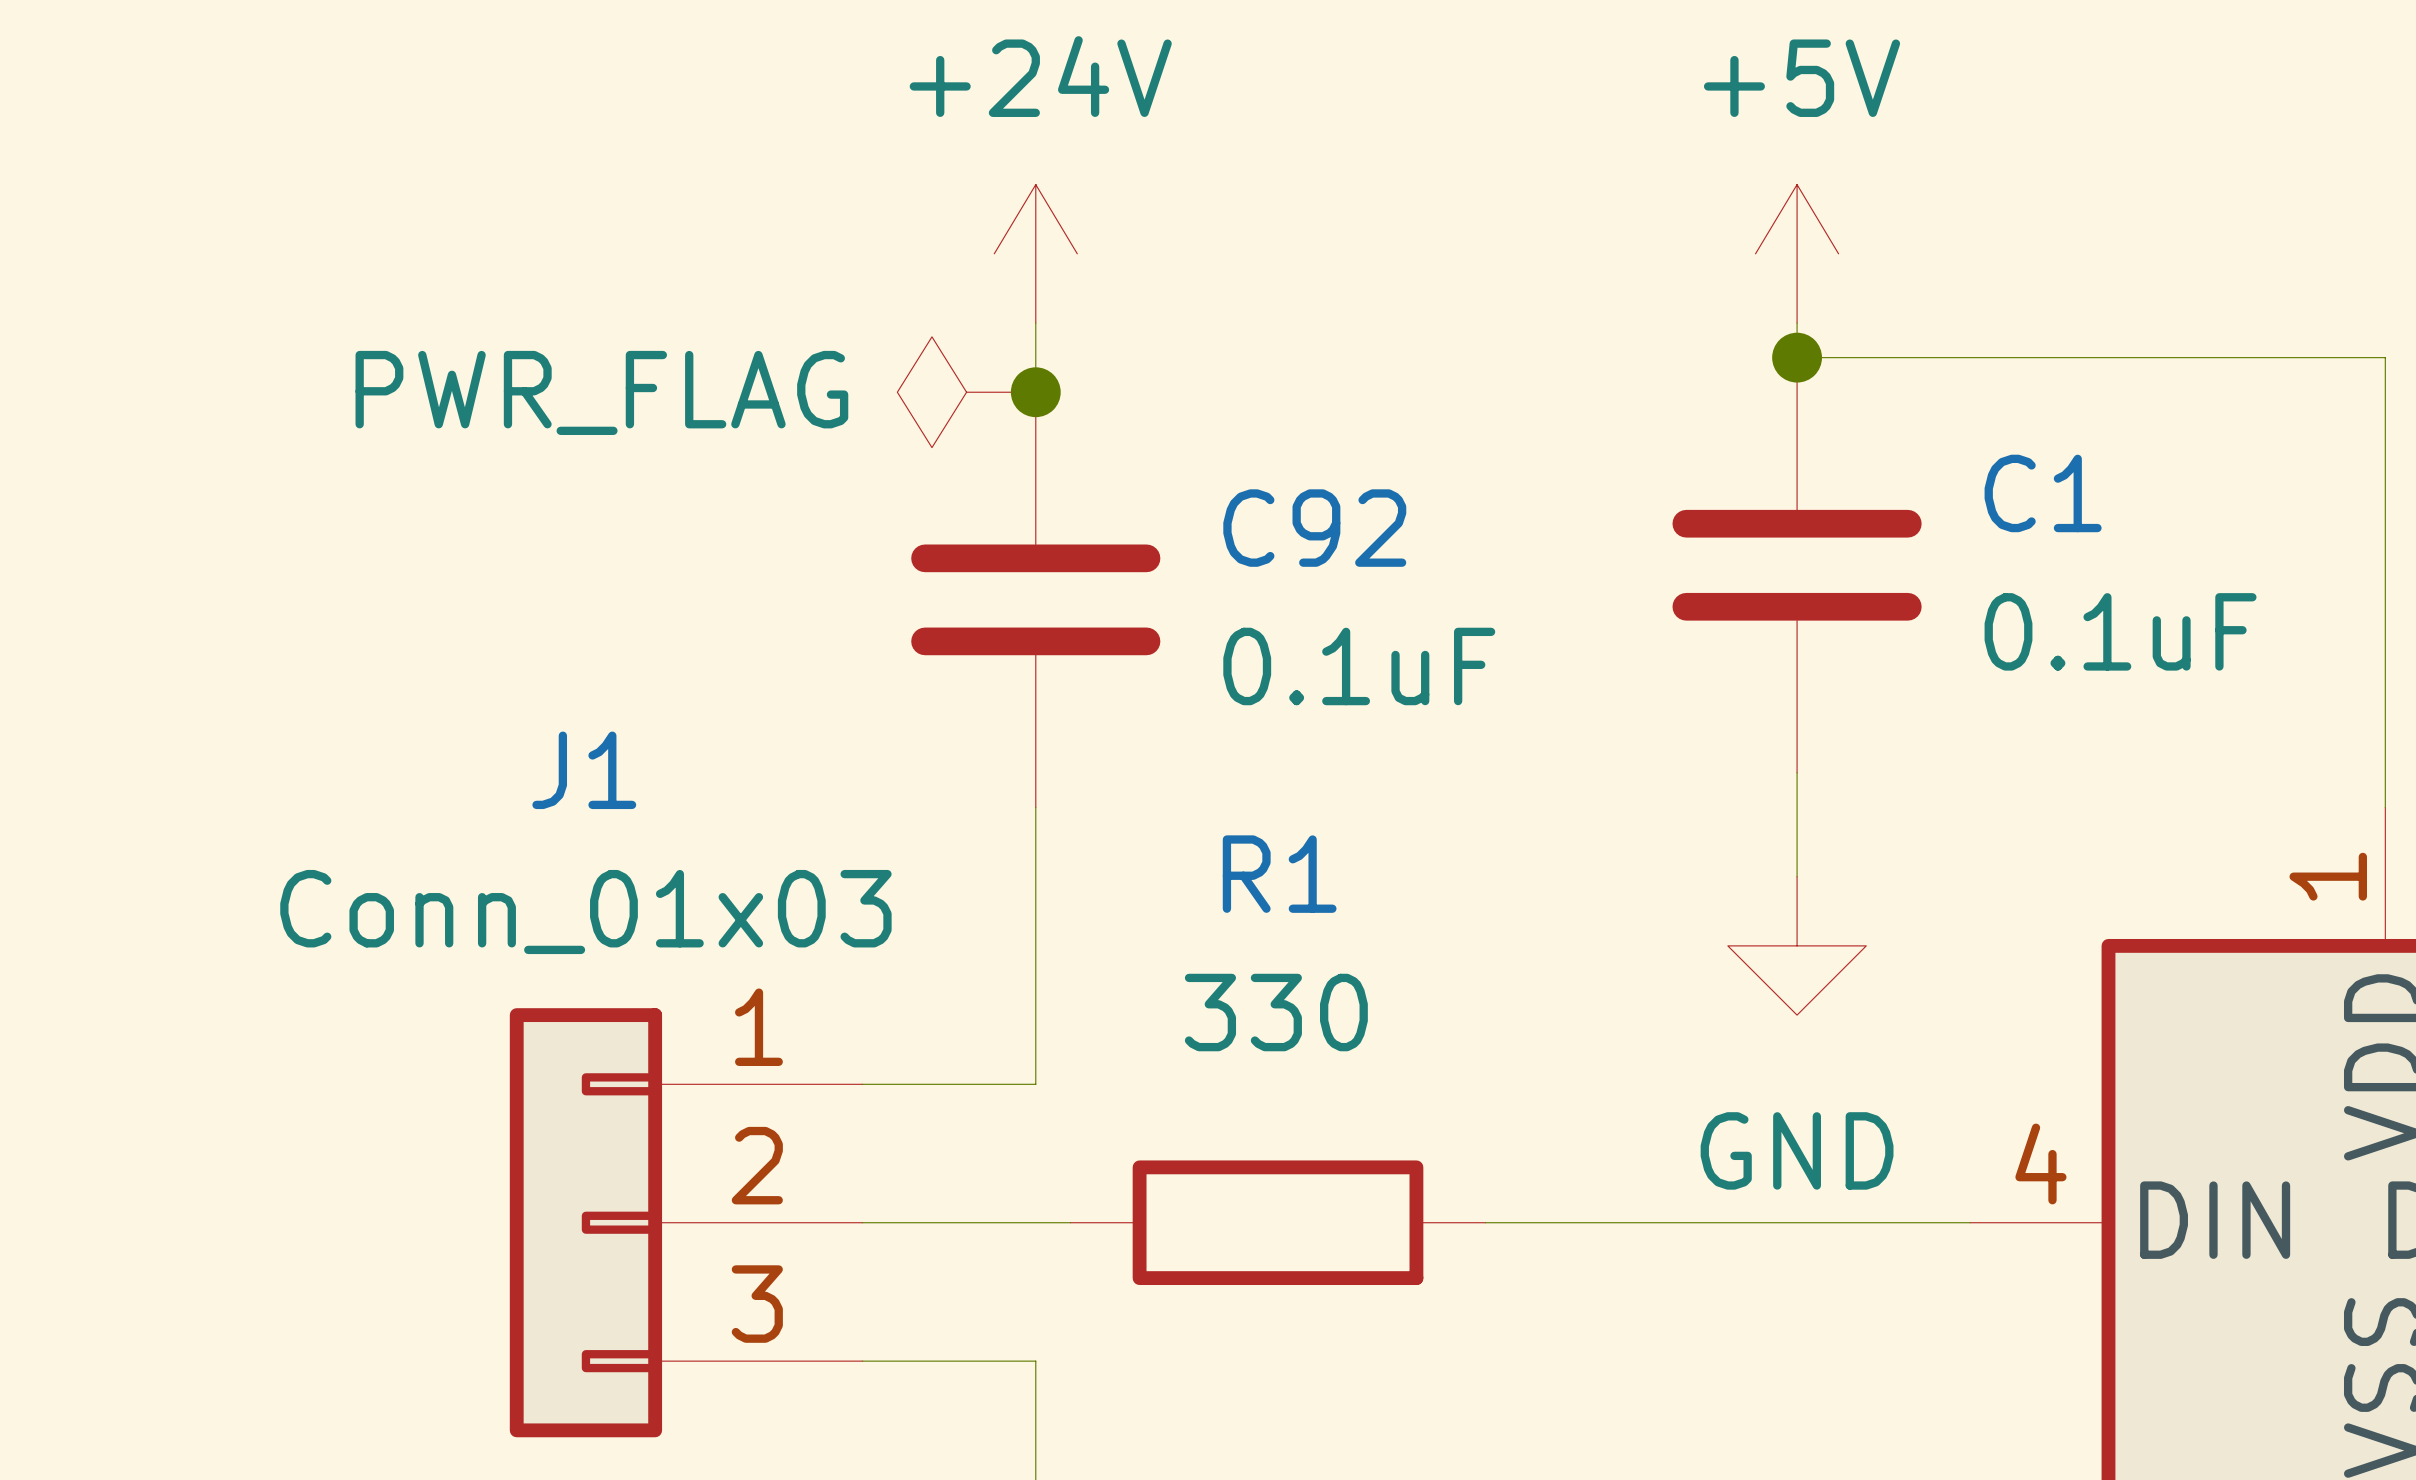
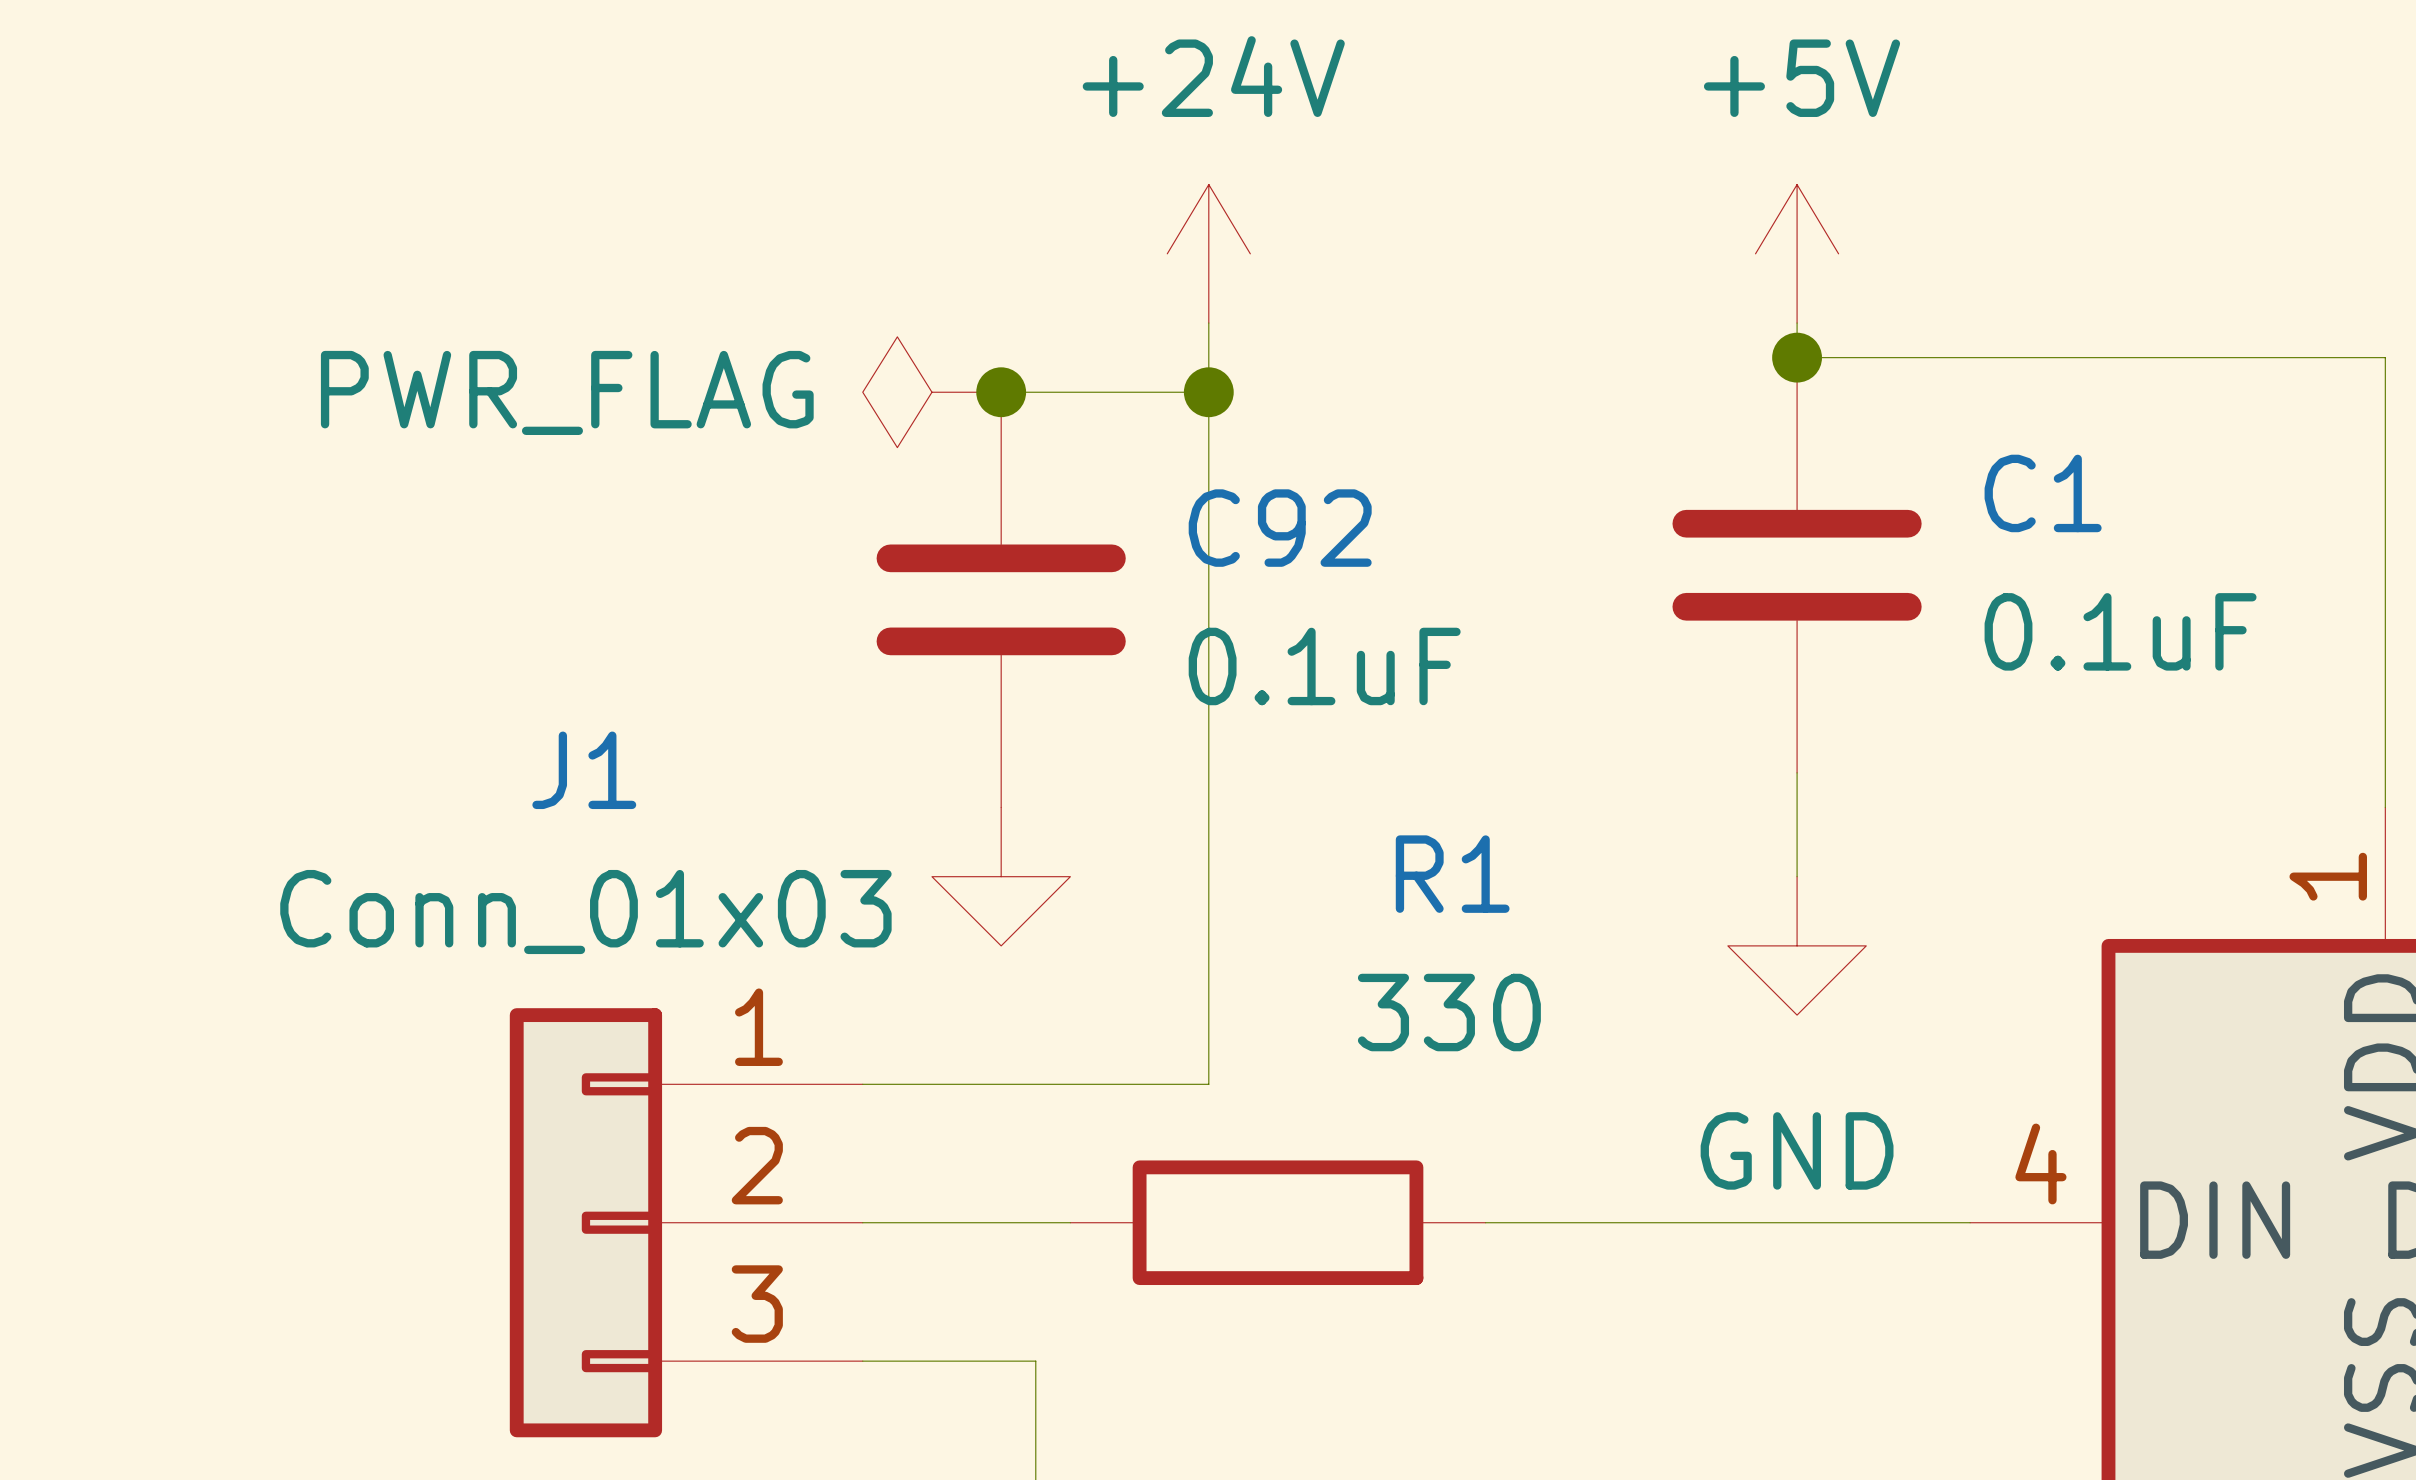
power symbol position: +24V (1035, 253) -> +24V (1208, 253)
wire: (1035, 323) (1035, 392) -> none
power symbol position: PWR_FLAG (966, 392) -> PWR_FLAG (931, 392)
wire: none -> (1001, 392) (1208, 392)
junction position: (1035, 392) -> (1001, 392)
junction: none -> (1208, 392)
C92 position: (1035, 599) -> (1001, 599)
wire: (1035, 807) (1035, 1084) -> (1208, 323) (1208, 1084) (1035, 1084)
R1 name position: R1 (1279, 874) -> R1 (1452, 874)
power symbol: none -> (1001, 876)
R1 value position: 330 (1276, 1012) -> 330 (1449, 1012)

